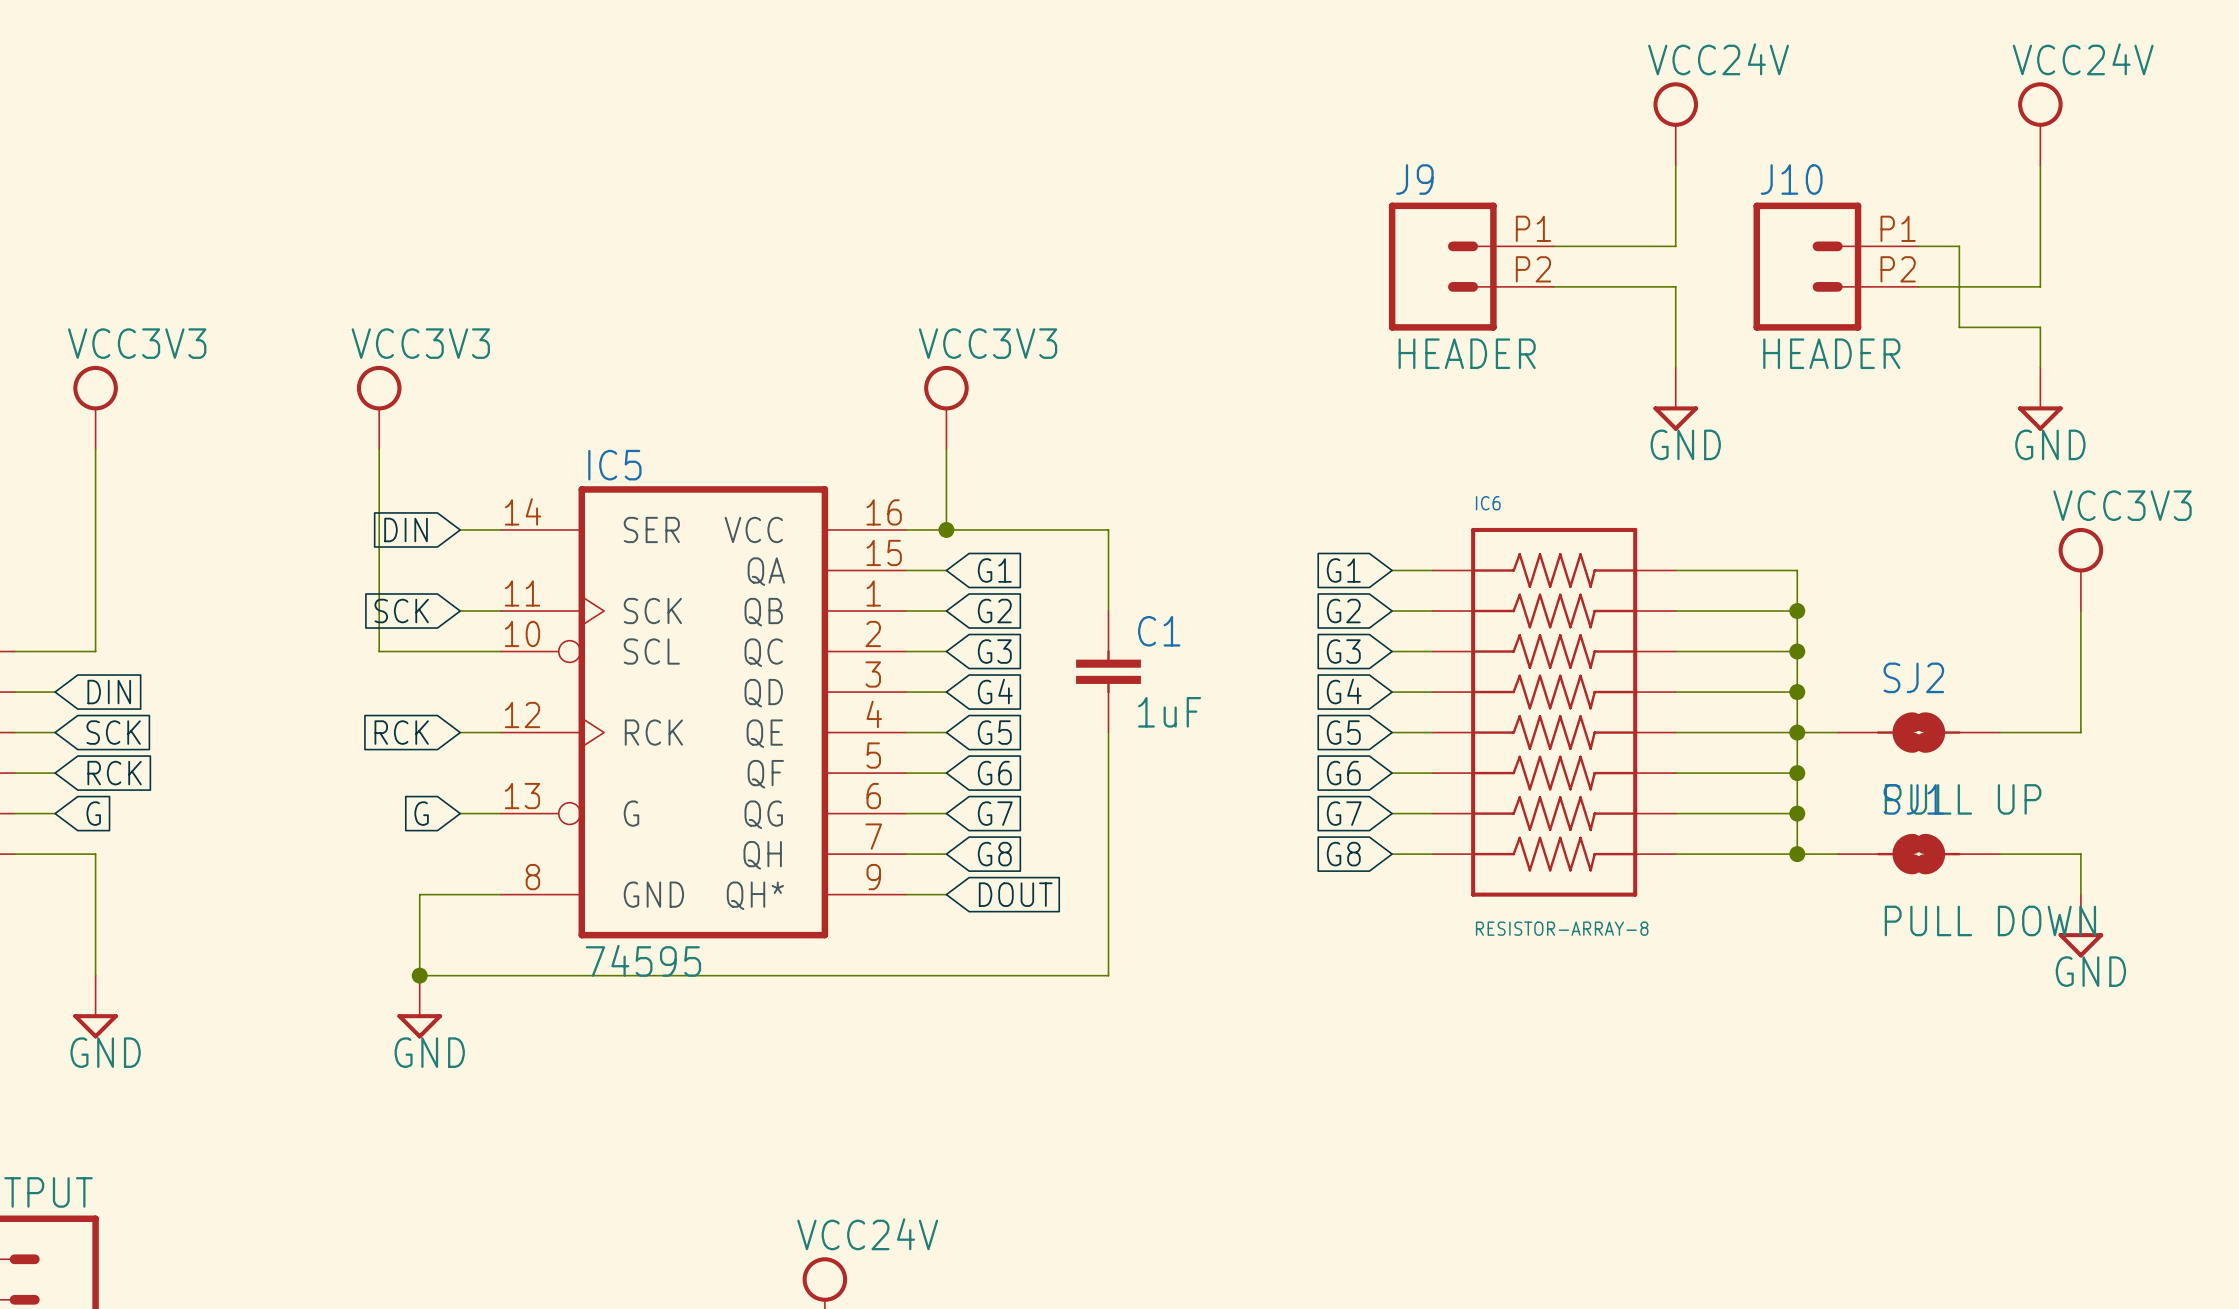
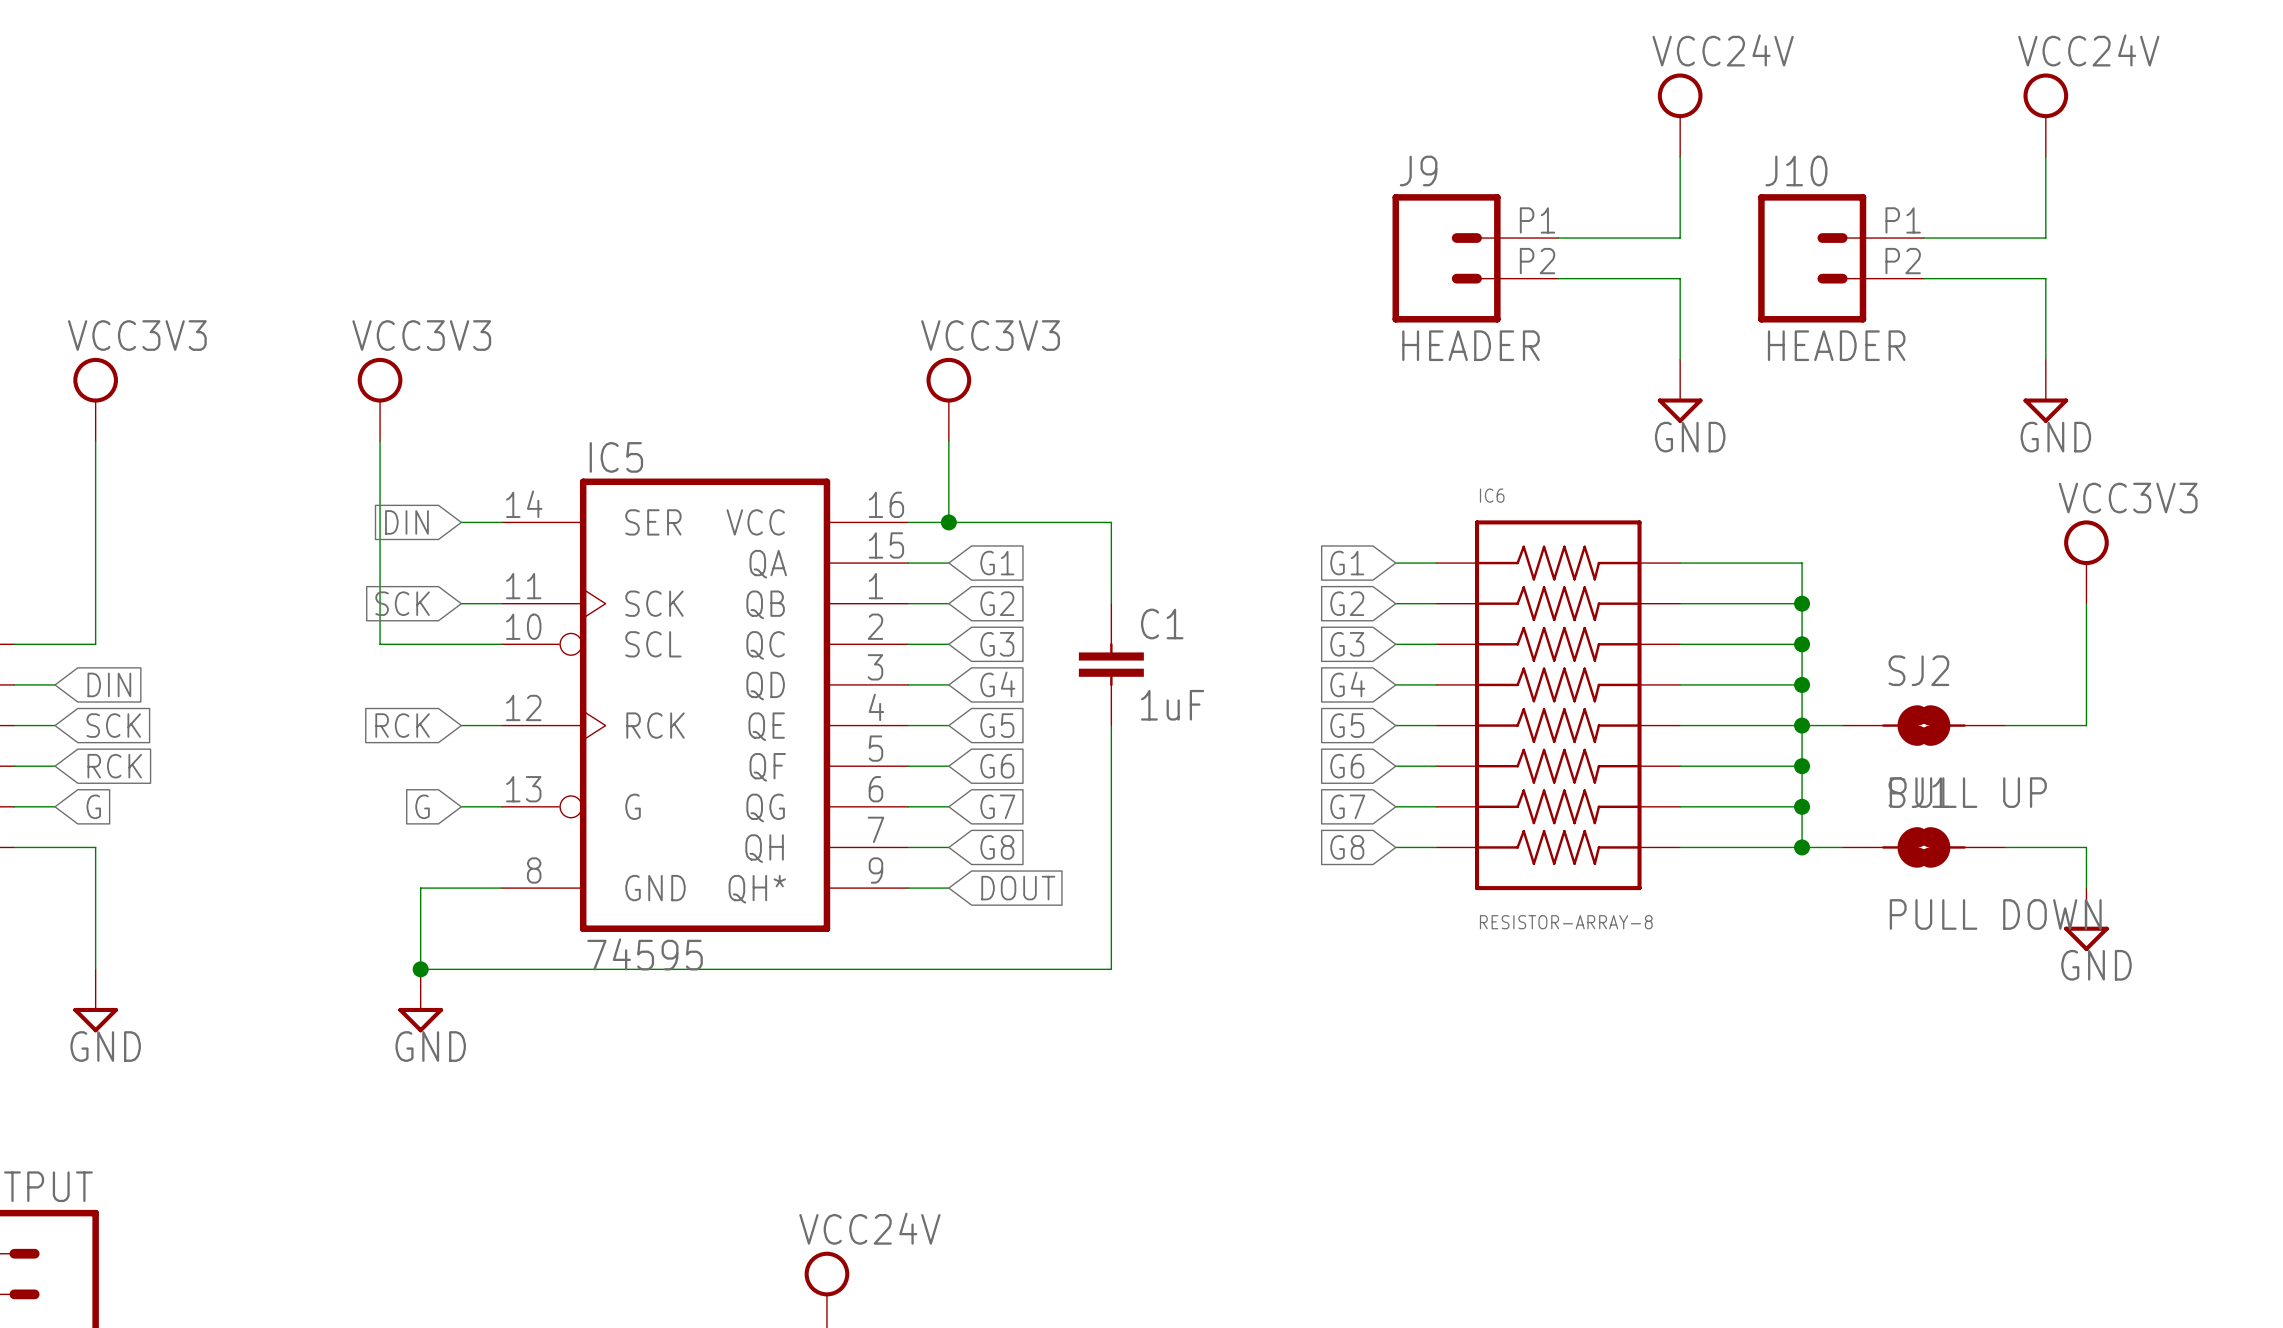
wire: (1959, 246) (1959, 327) (2040, 327) -> (1964, 238) (2045, 238)
wire: (2040, 246) (2040, 286) -> (2045, 319) (2045, 278)

